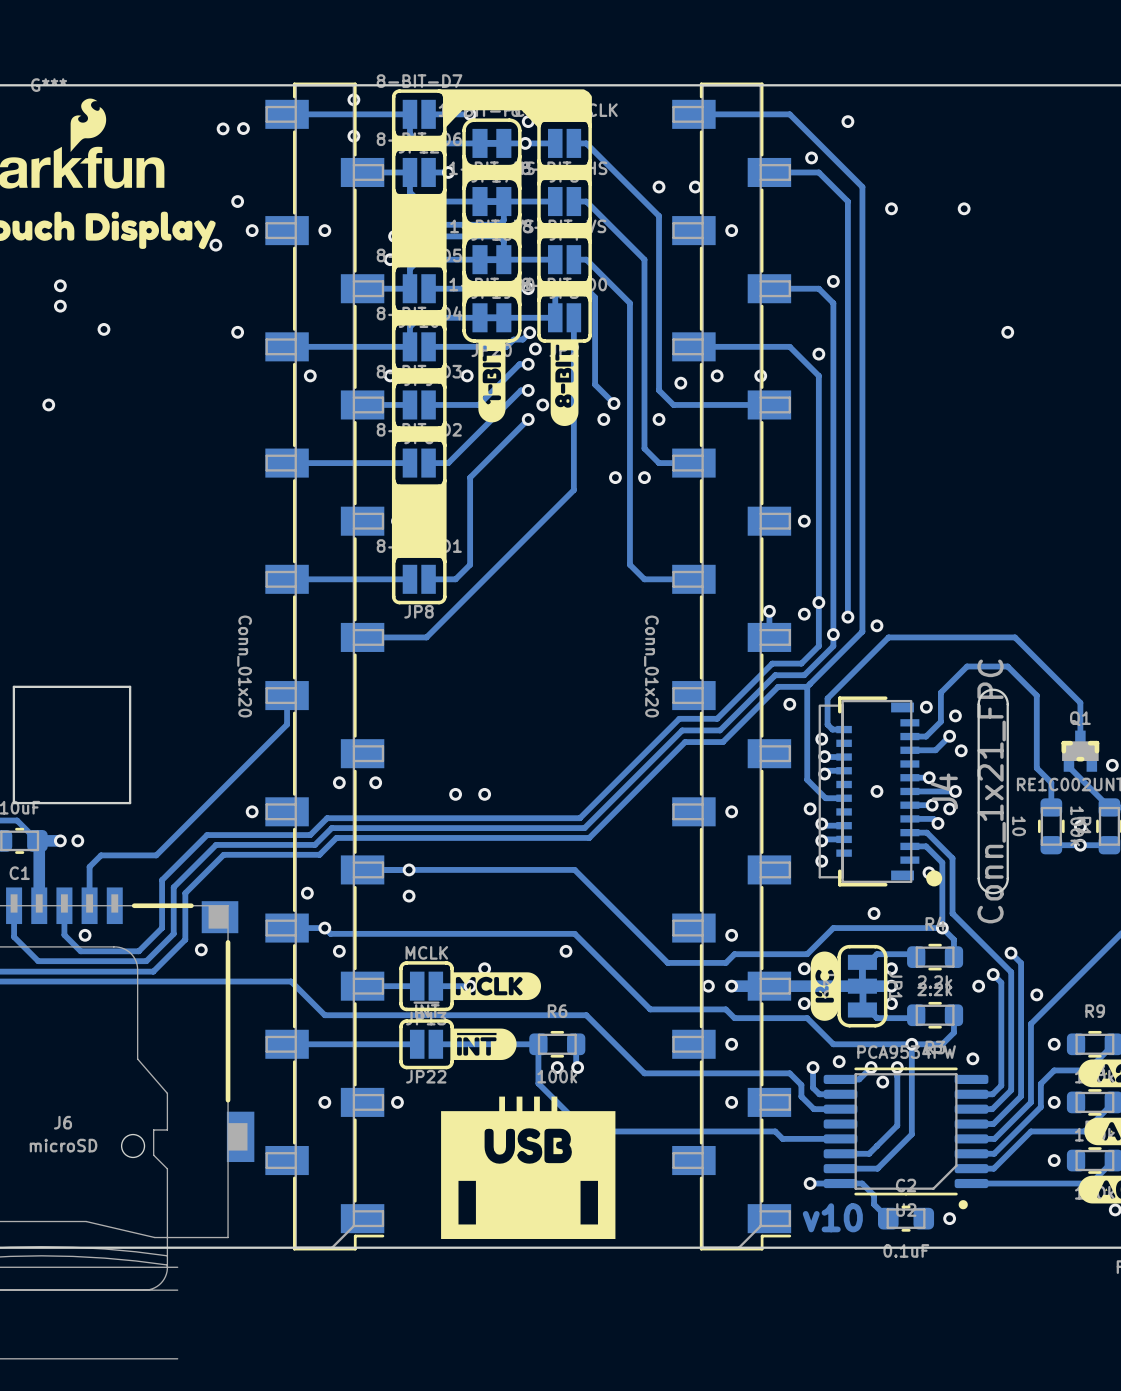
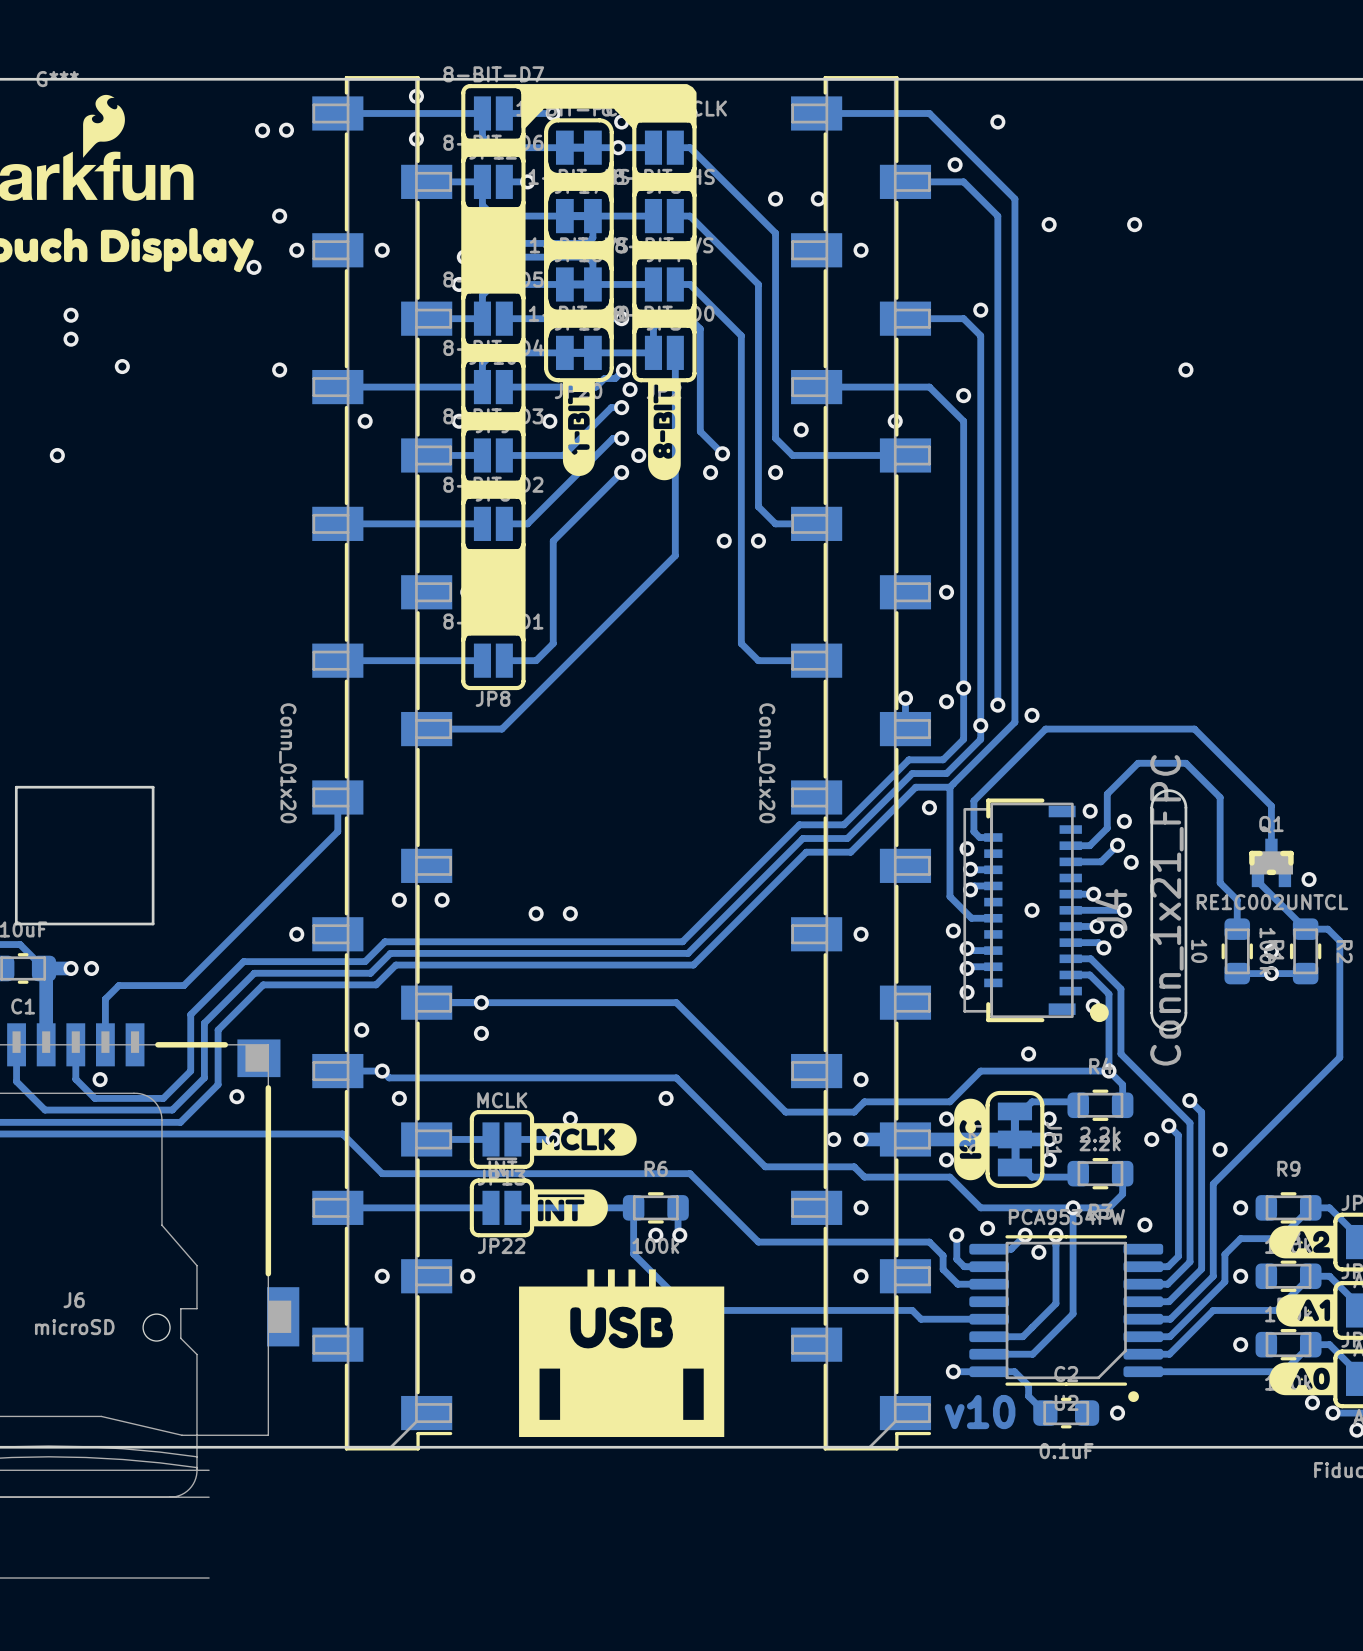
via: (717, 375) -> none

